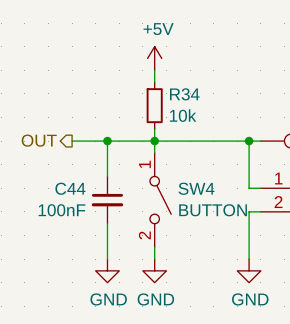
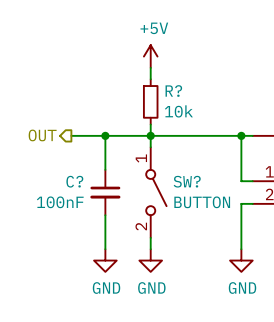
R34 name: R34 (184, 94) -> R? (173, 91)
C44 name: C44 (70, 188) -> C? (74, 181)
SW4 name: SW4 (196, 188) -> SW? (187, 181)

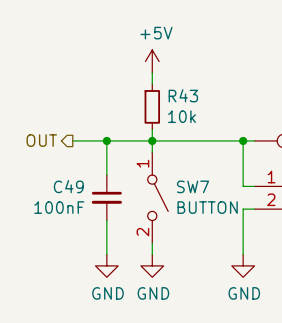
R? name: R? (173, 91) -> R43 (183, 95)
C? name: C? (74, 181) -> C49 (68, 186)
SW? name: SW? (187, 181) -> SW7 (193, 186)

